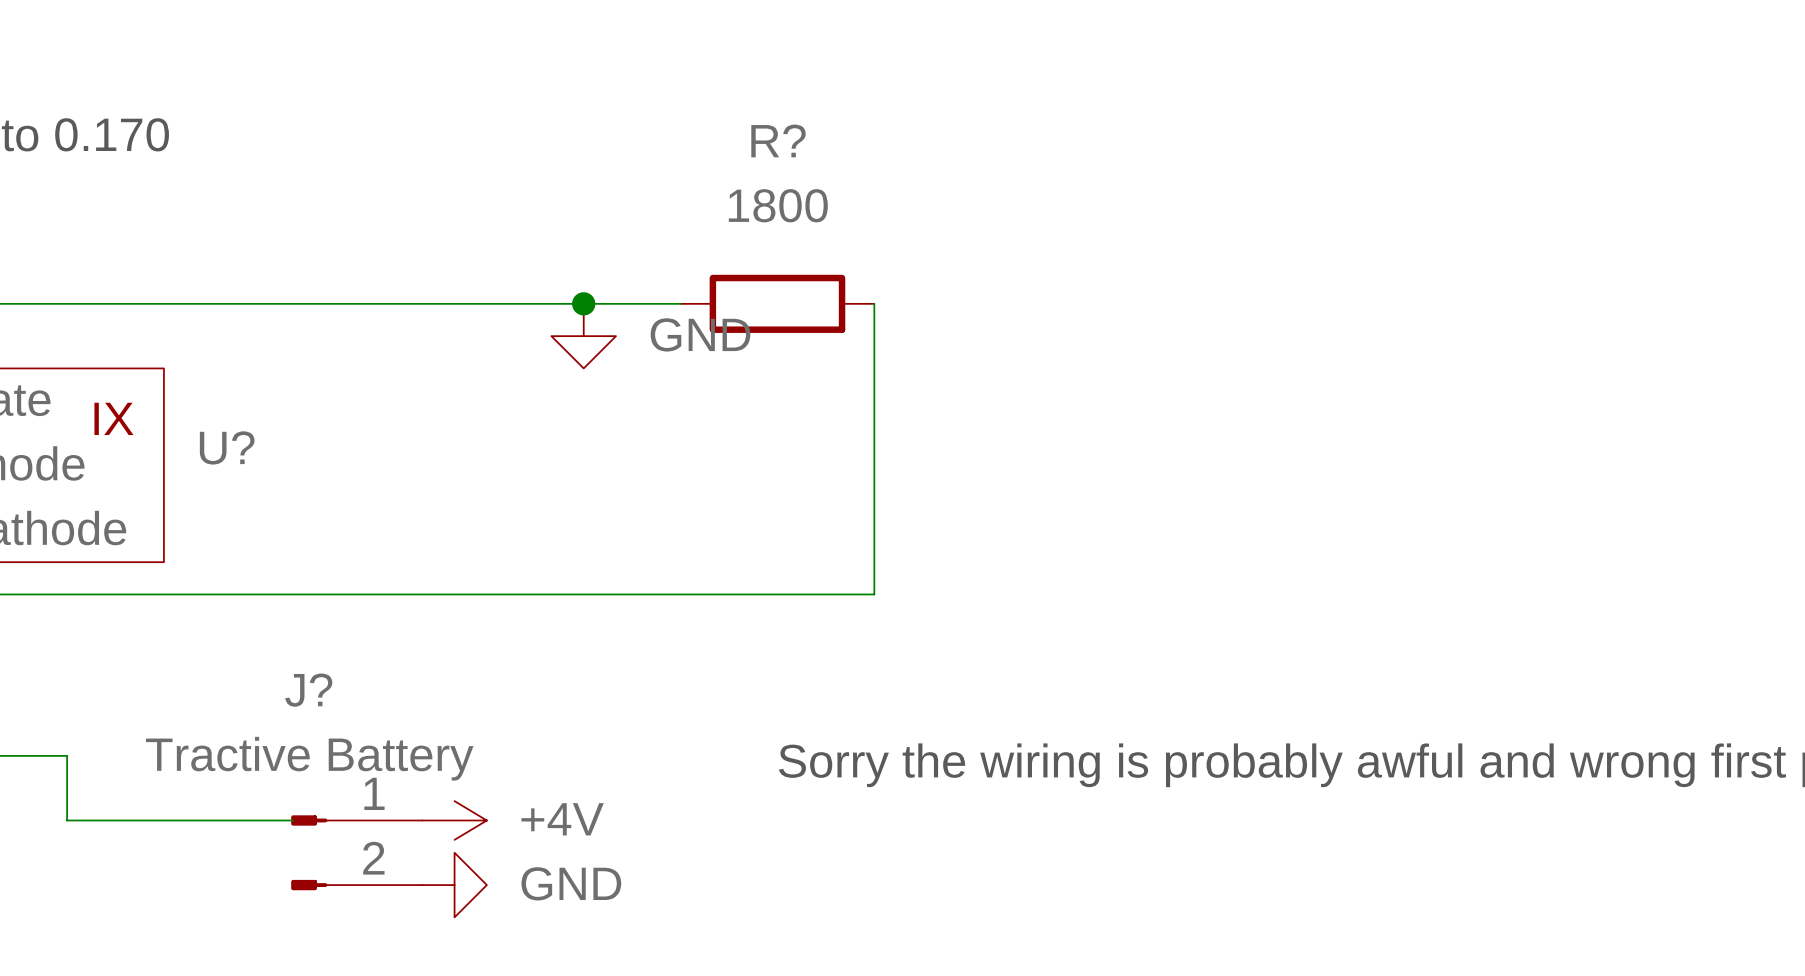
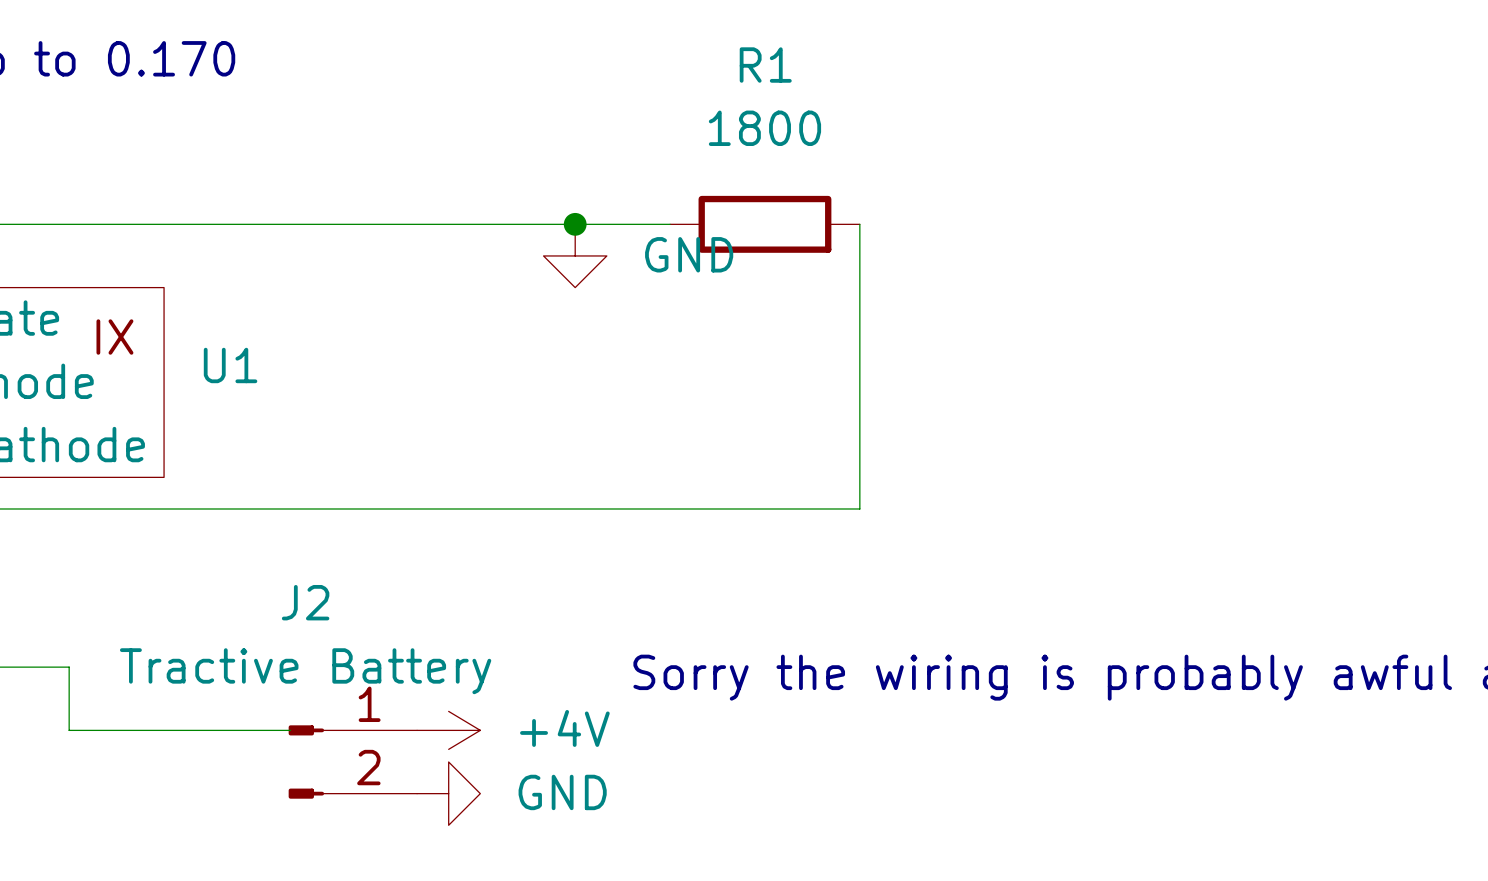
R? name: R? (778, 140) -> R1 (765, 65)
U? name: U? (227, 447) -> U1 (230, 365)
J? name: J? (308, 690) -> J2 (305, 602)

